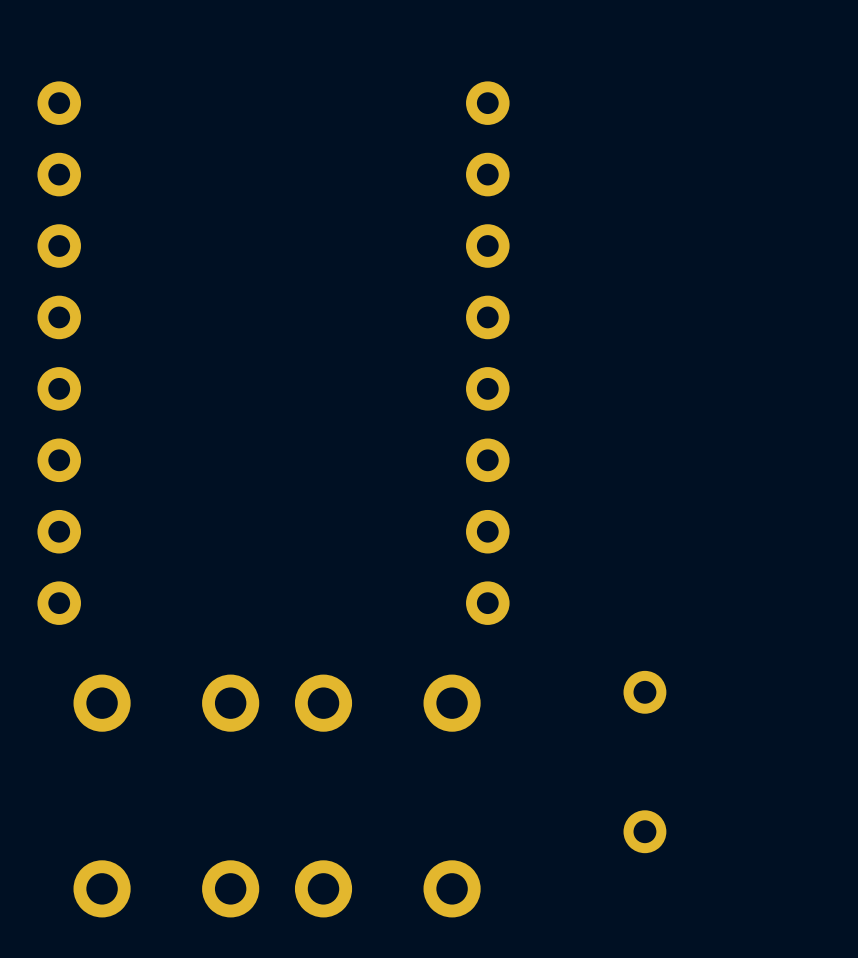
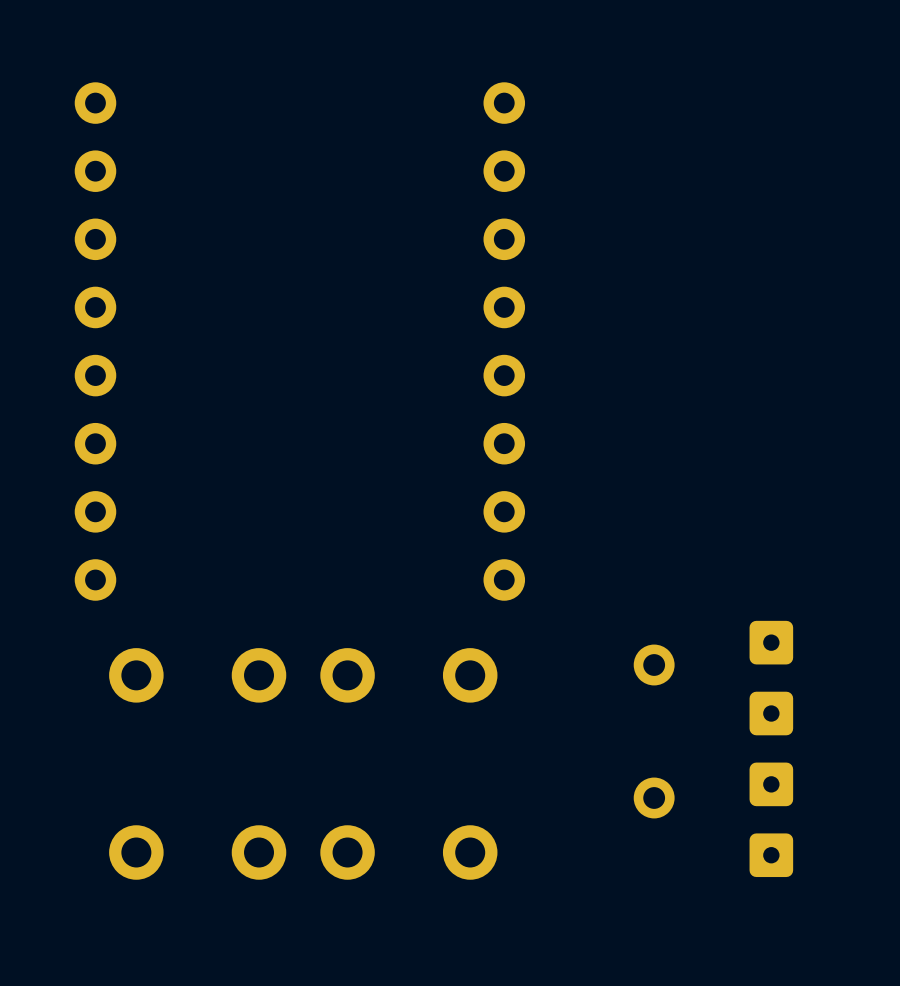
part: none -> (771, 642)
part: none -> (771, 713)
part: none -> (771, 784)
part: none -> (771, 855)

